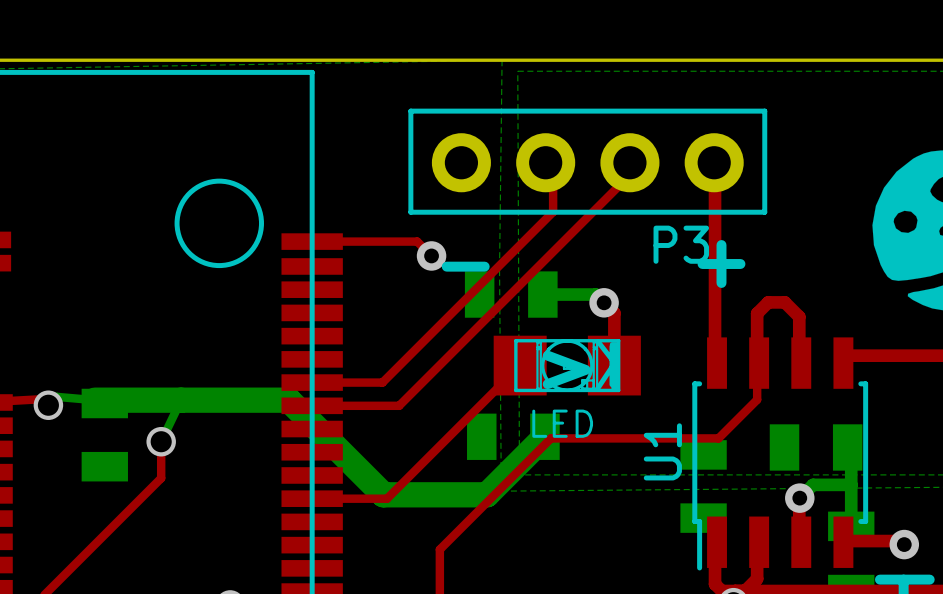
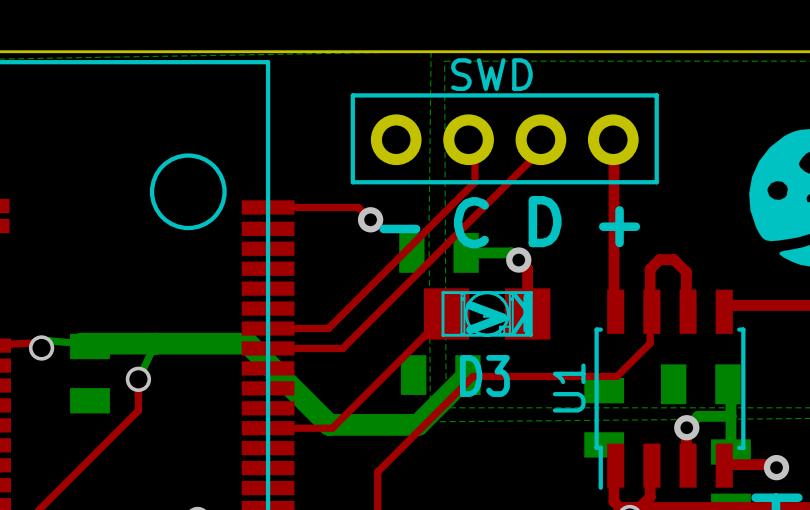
P3 value: none -> SWD (491, 74)
P3 name: P3 (681, 244) -> none
text: none -> D (545, 221)
text: none -> C (471, 222)
D3 value: LED (562, 423) -> none
D3 name: none -> D3 (484, 375)

